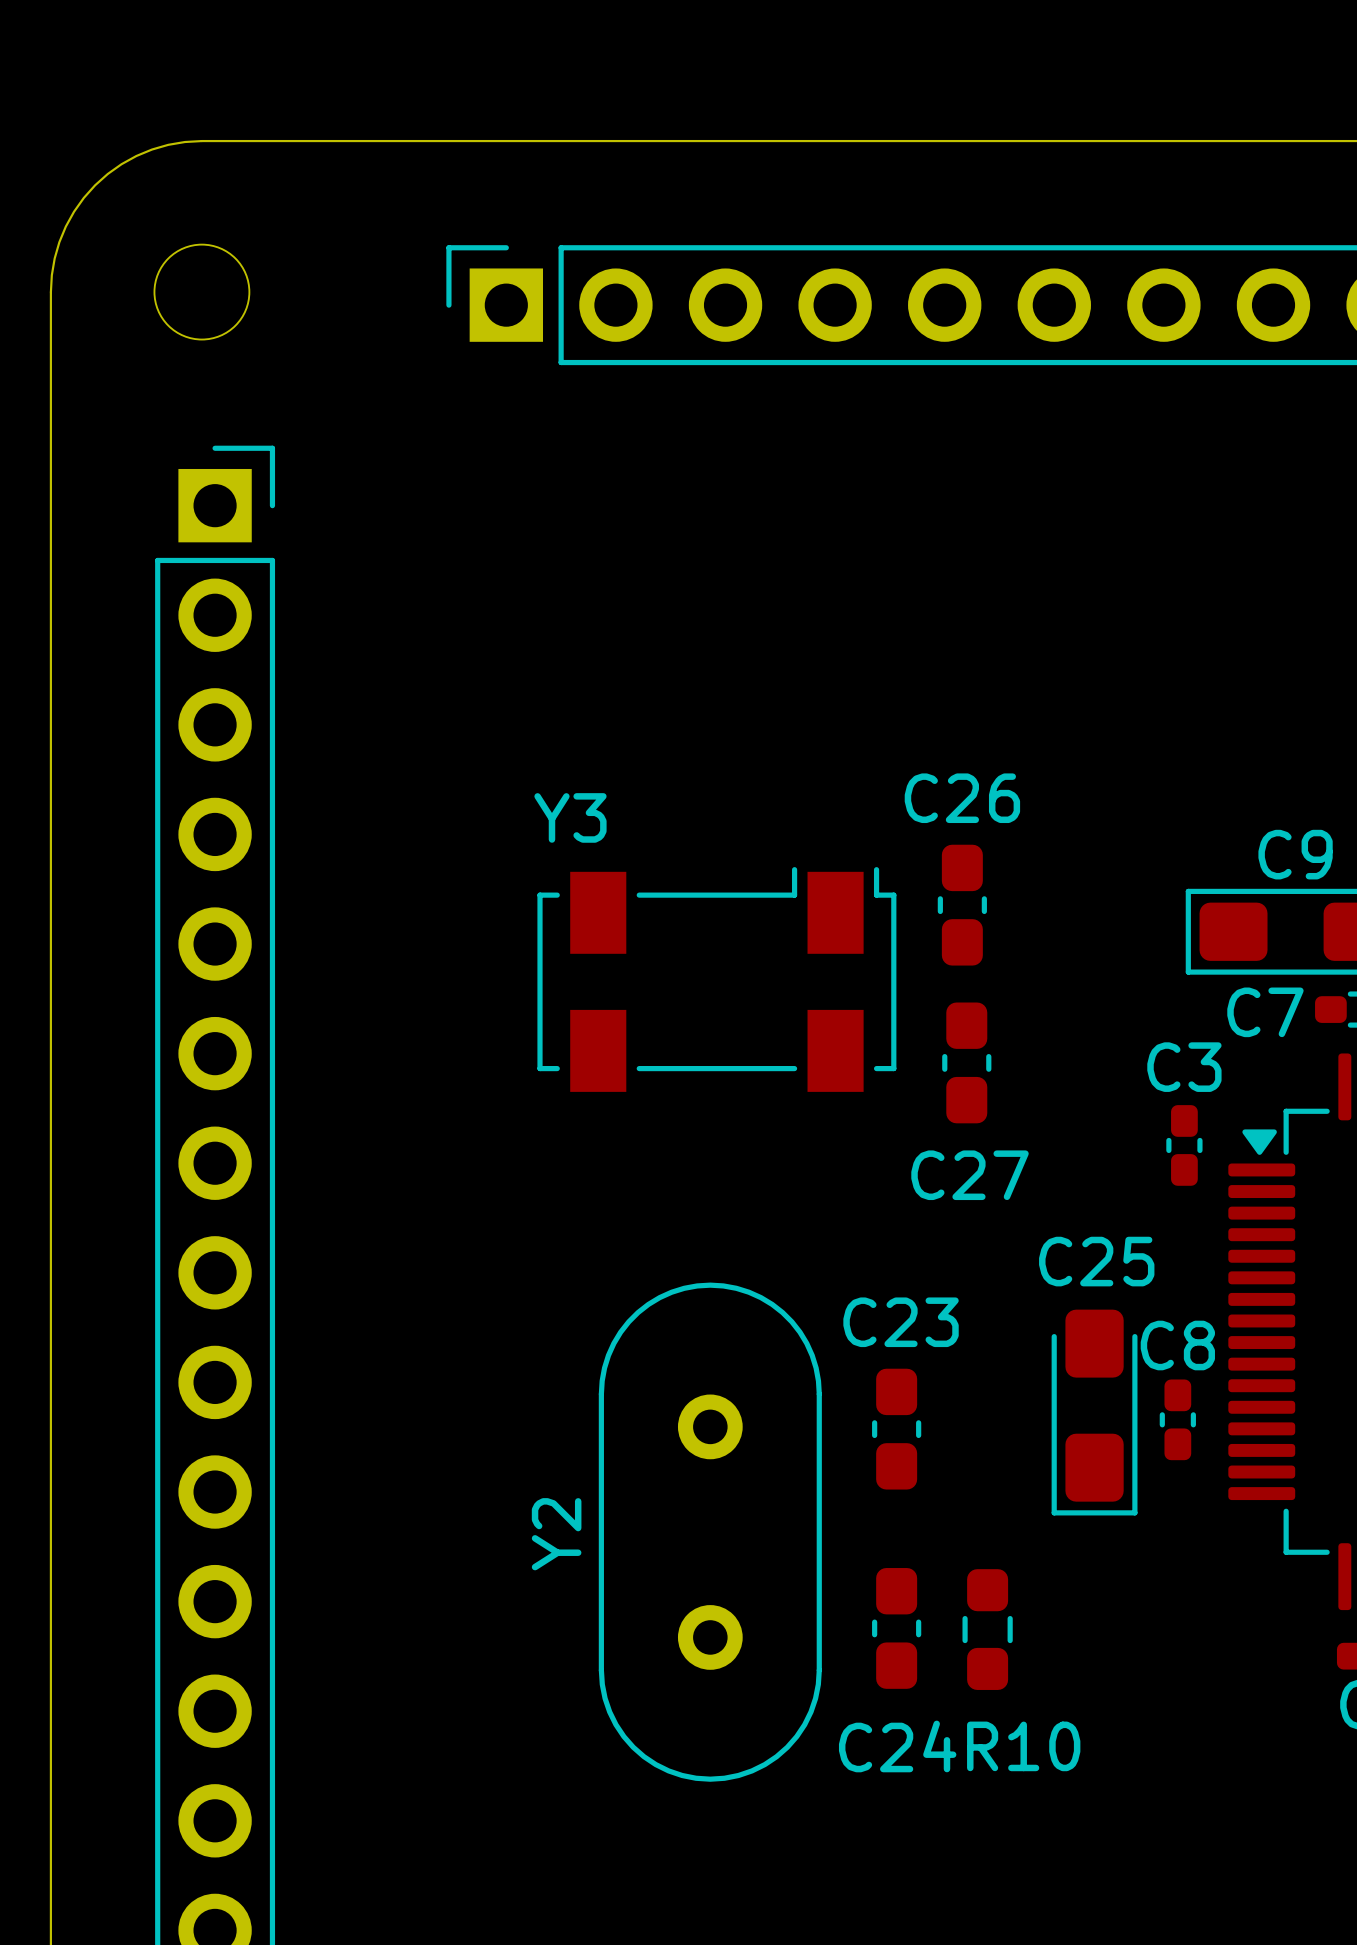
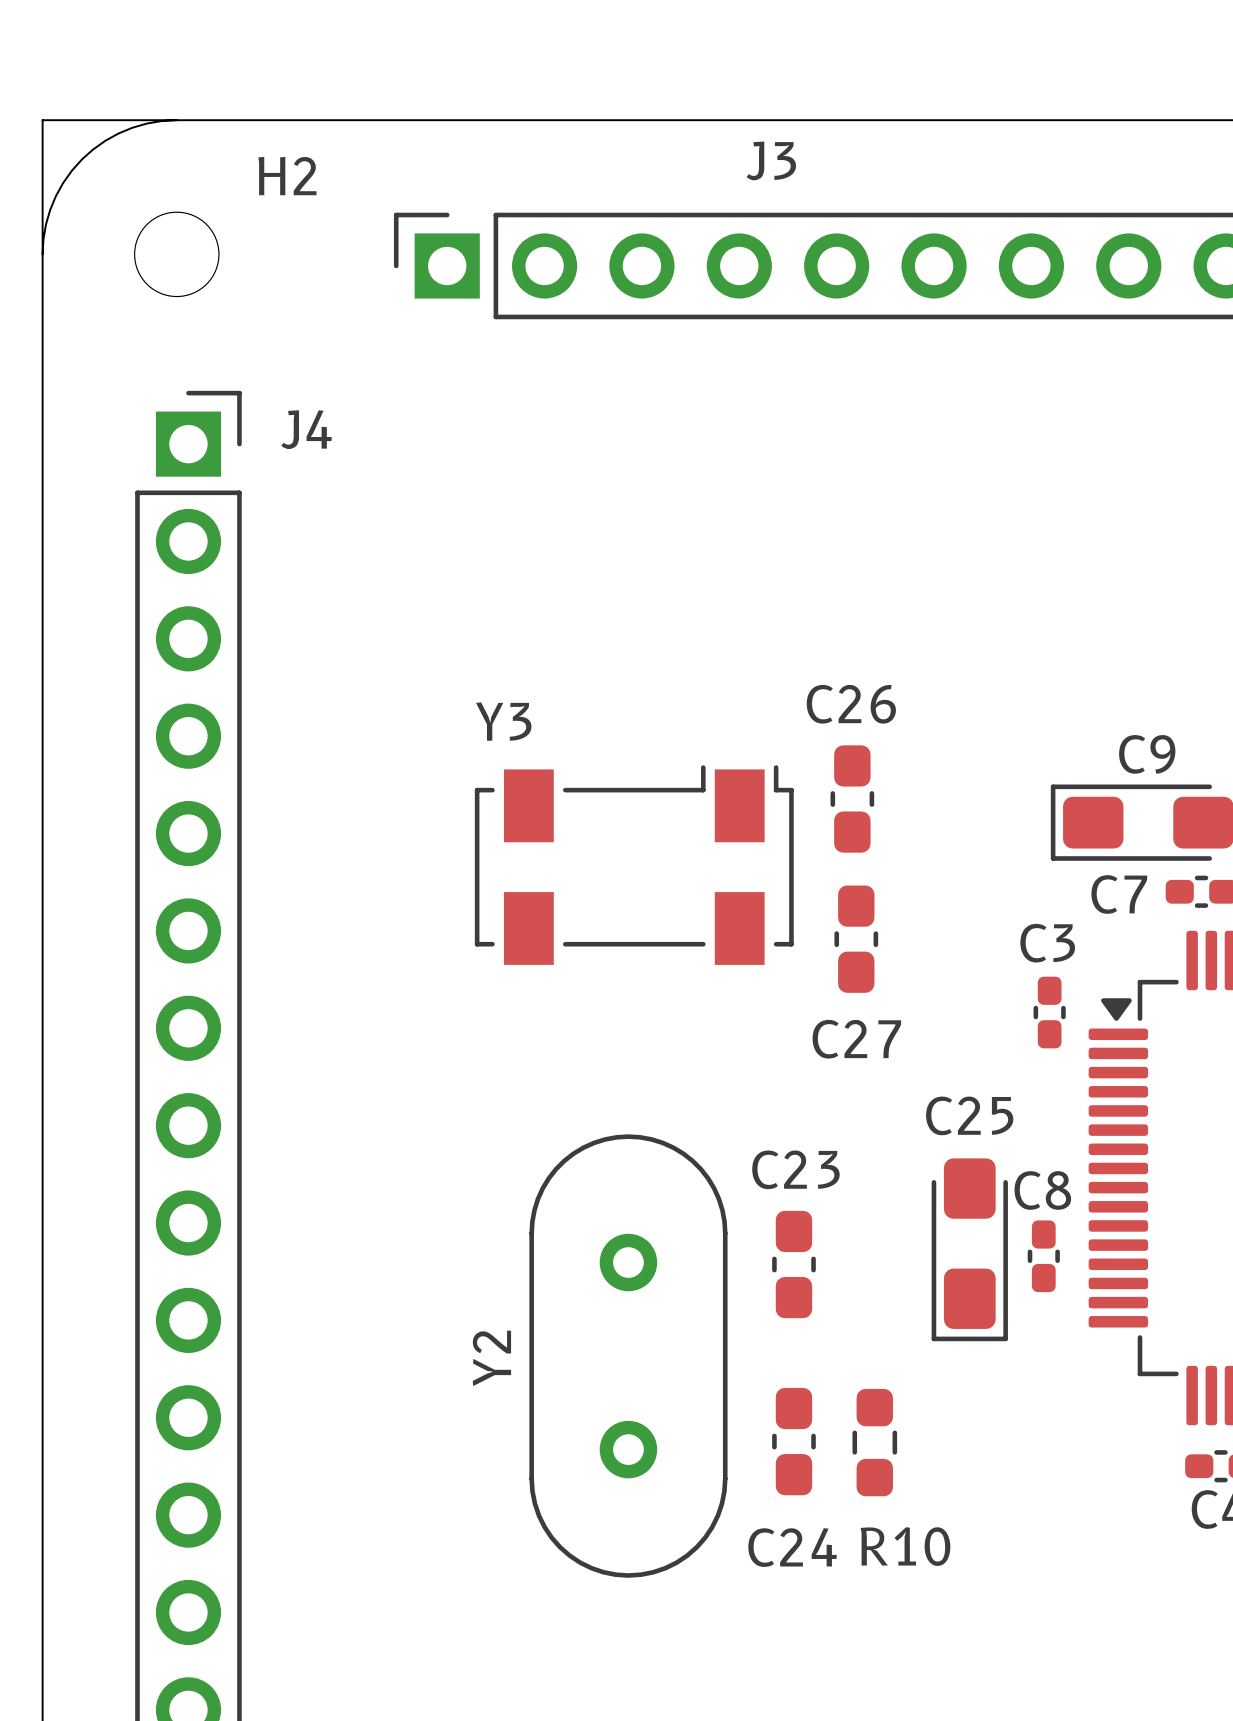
board edge: none -> (176, 120) (42, 120) (42, 254)
J3 name: none -> J3 (771, 160)
H2 name: none -> H2 (287, 176)
J4 name: none -> J4 (306, 429)

